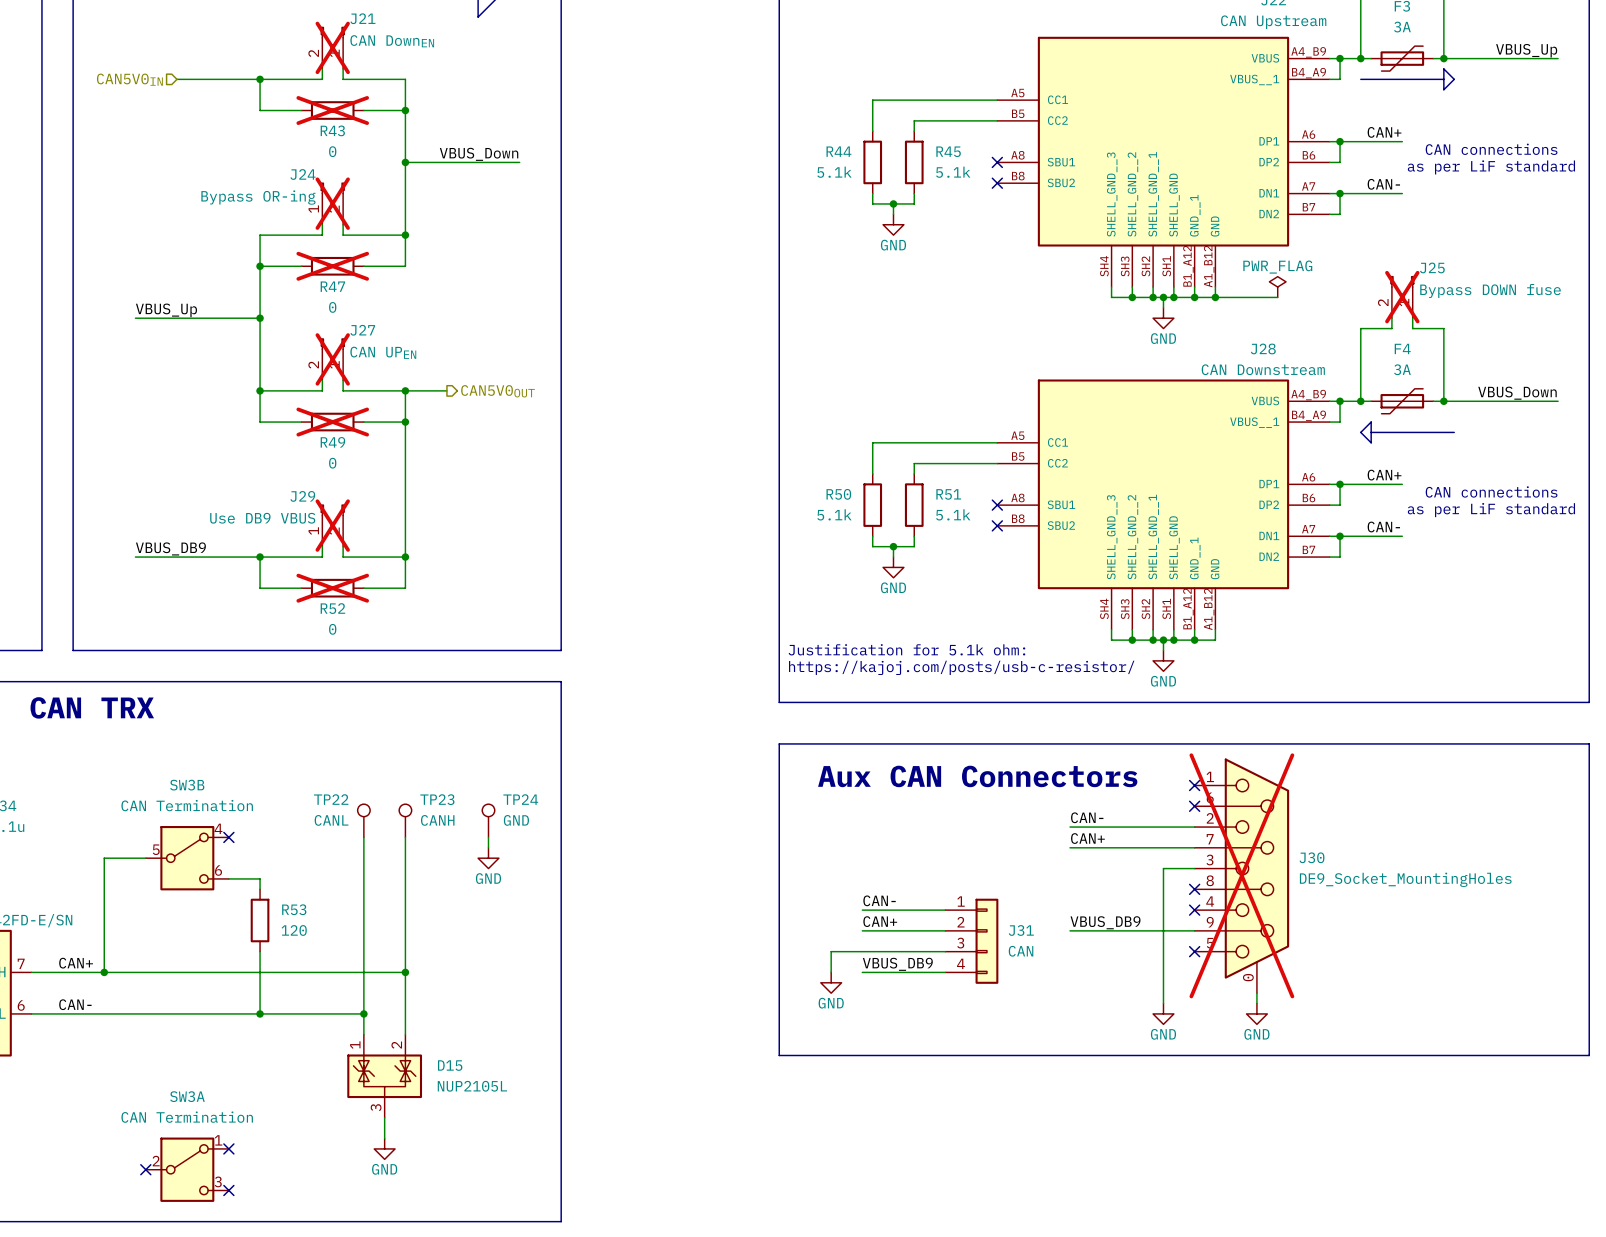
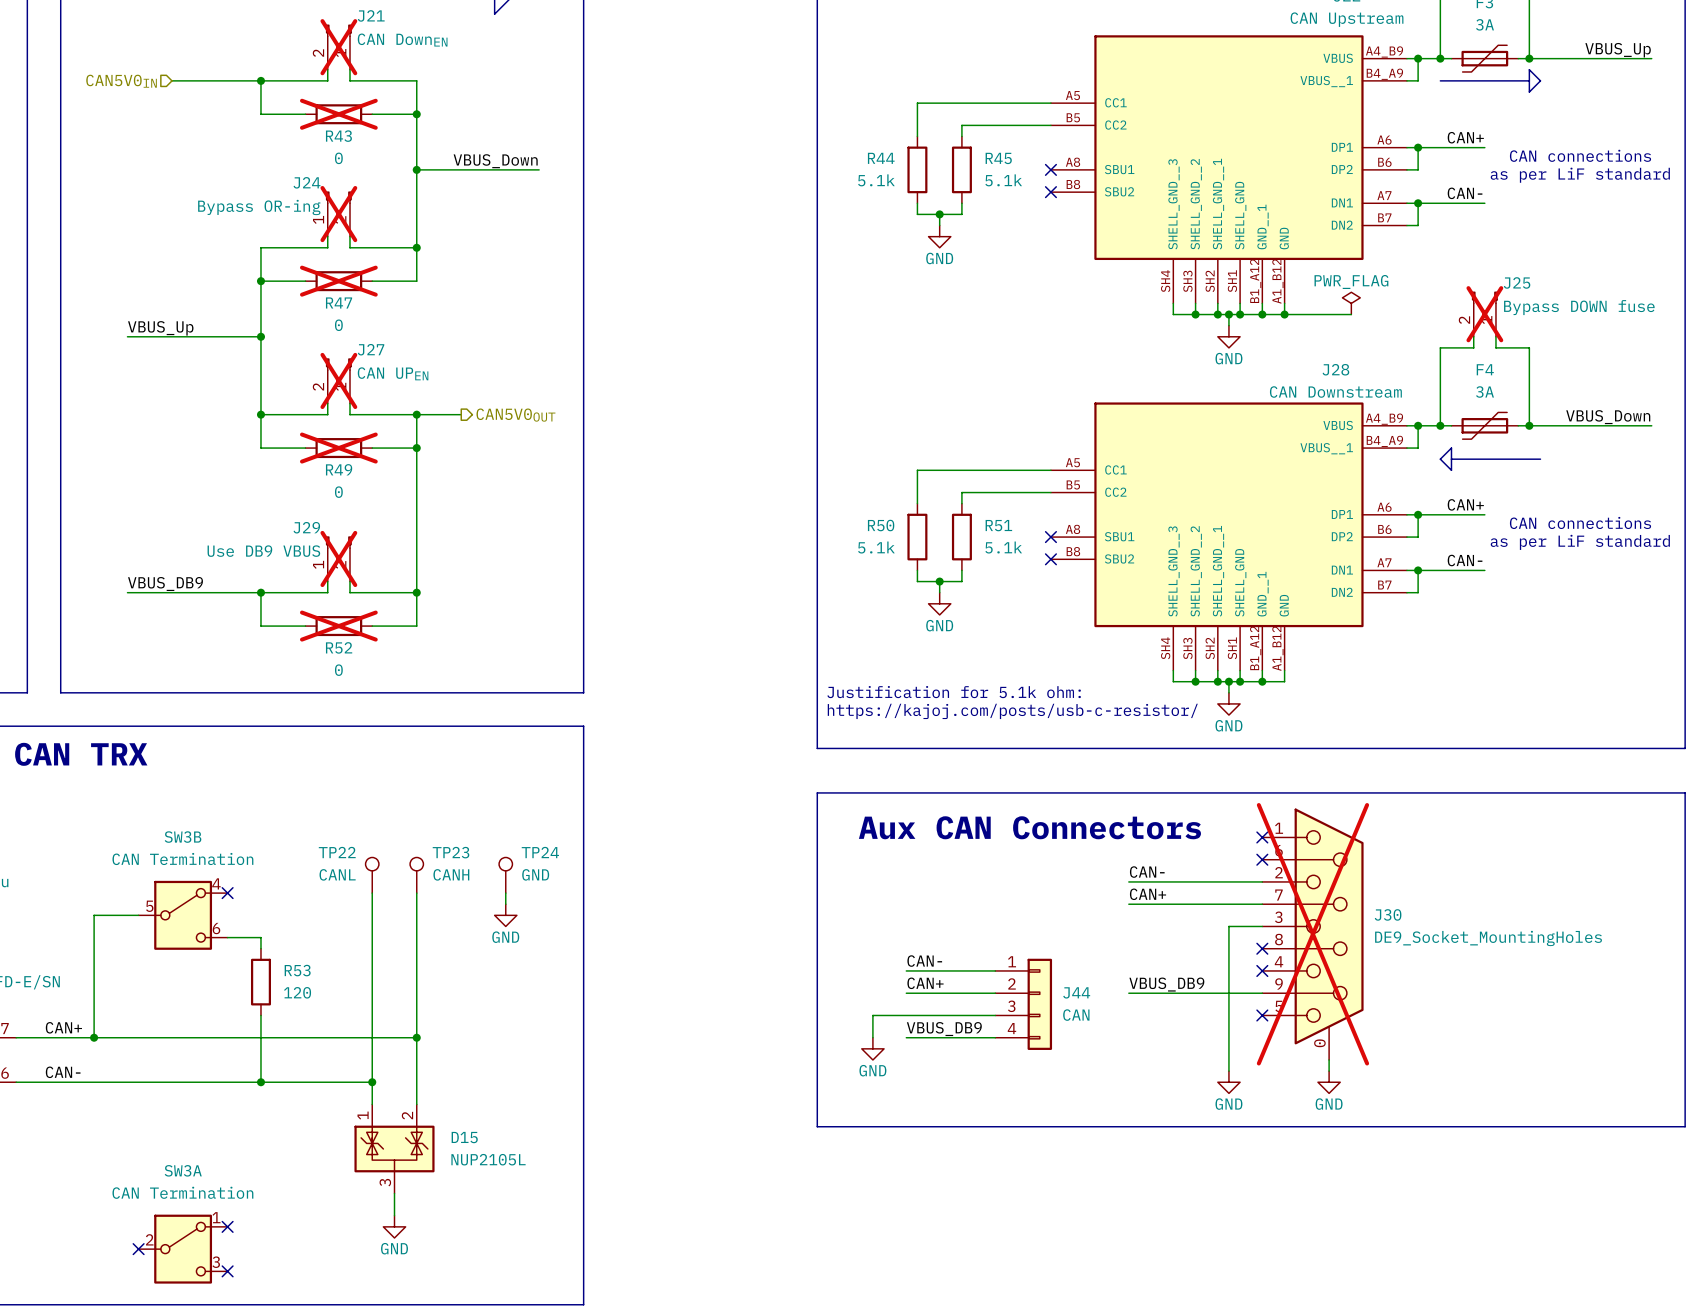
J31 name: J31 (1021, 930) -> J44 (1076, 992)

